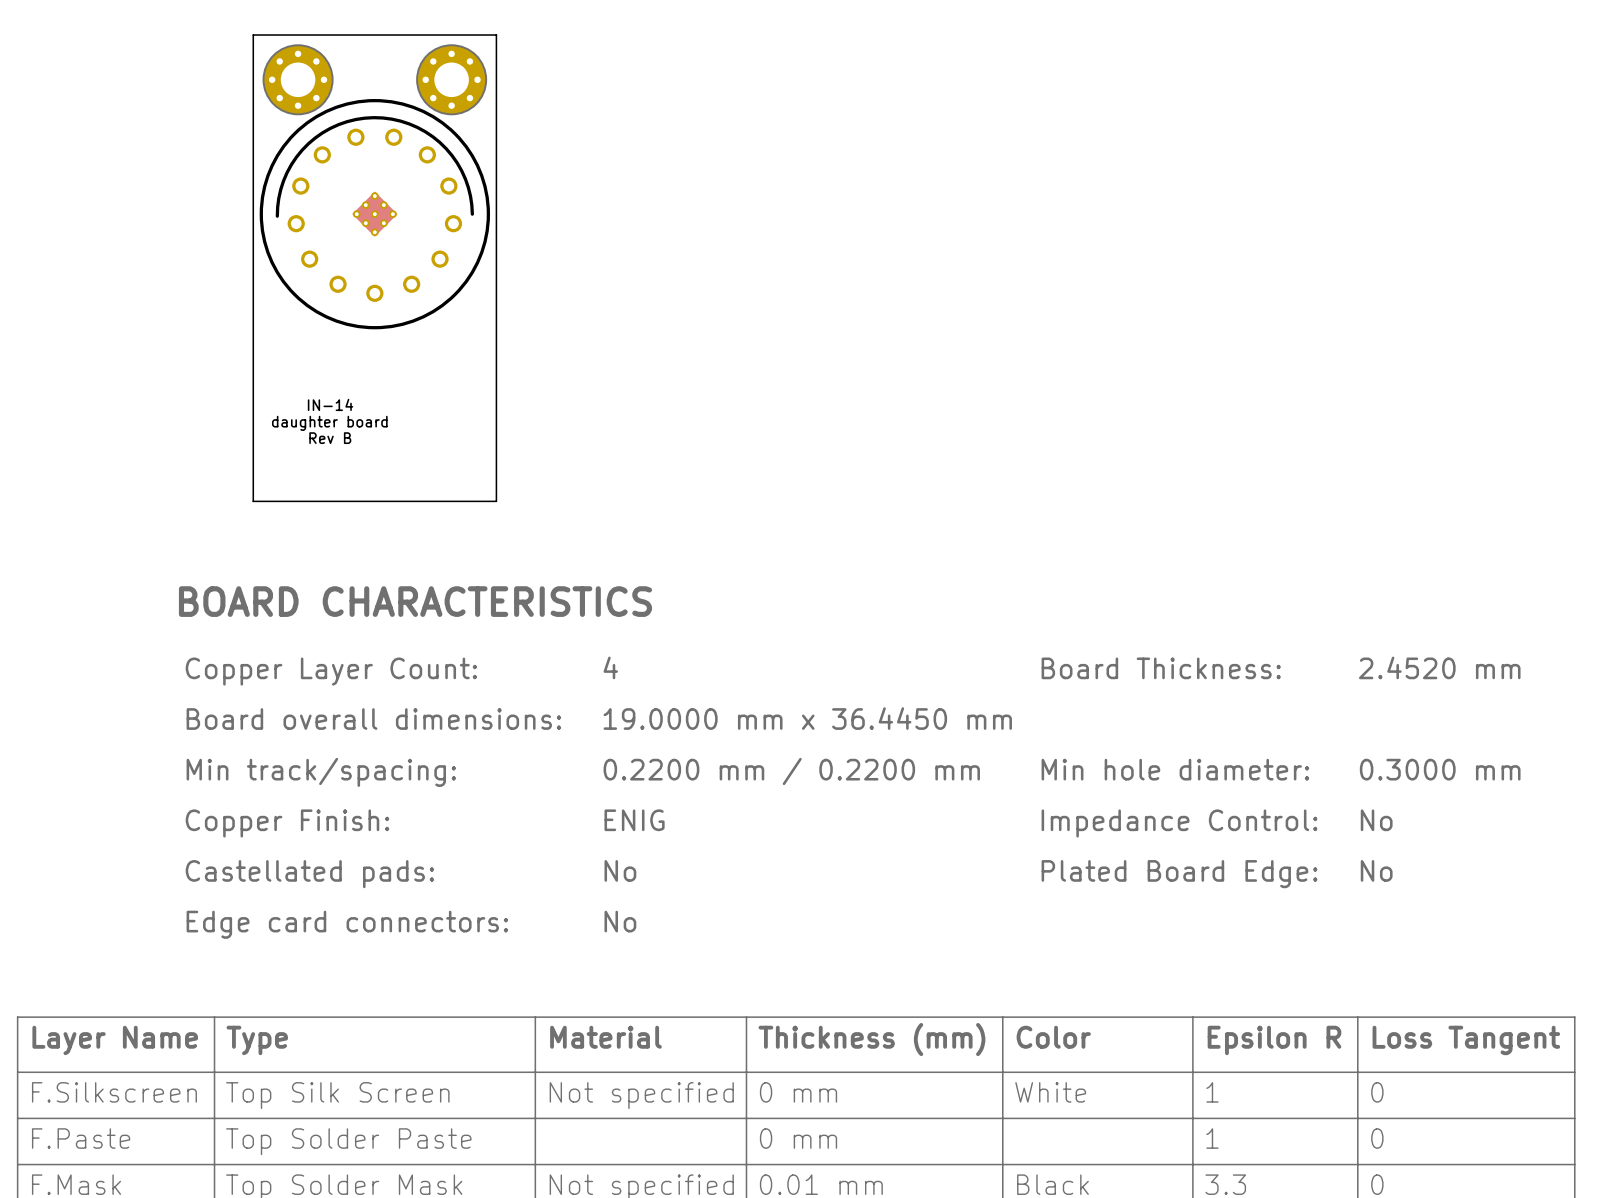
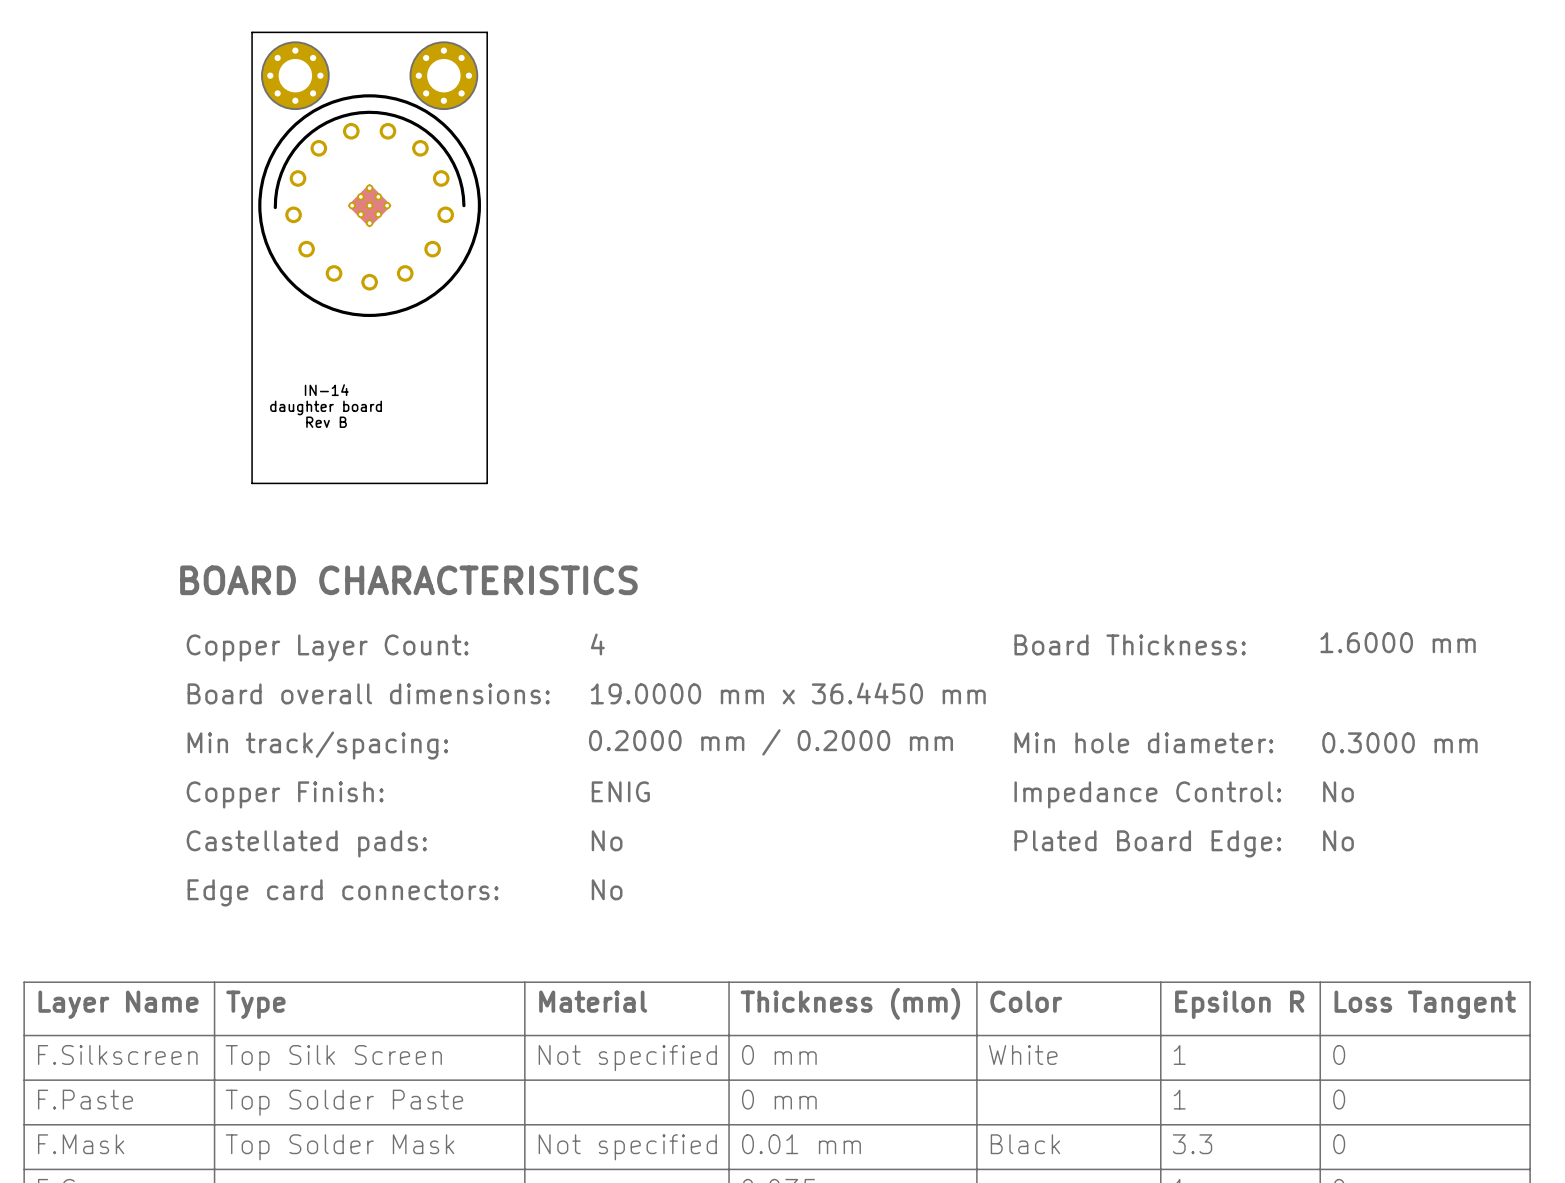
text: 2.4520 mm (1439, 667) -> 1.6000 mm (1398, 642)
text: 0.2200 mm / 0.2200 mm (791, 771) -> 0.2000 mm / 0.2000 mm (770, 742)

